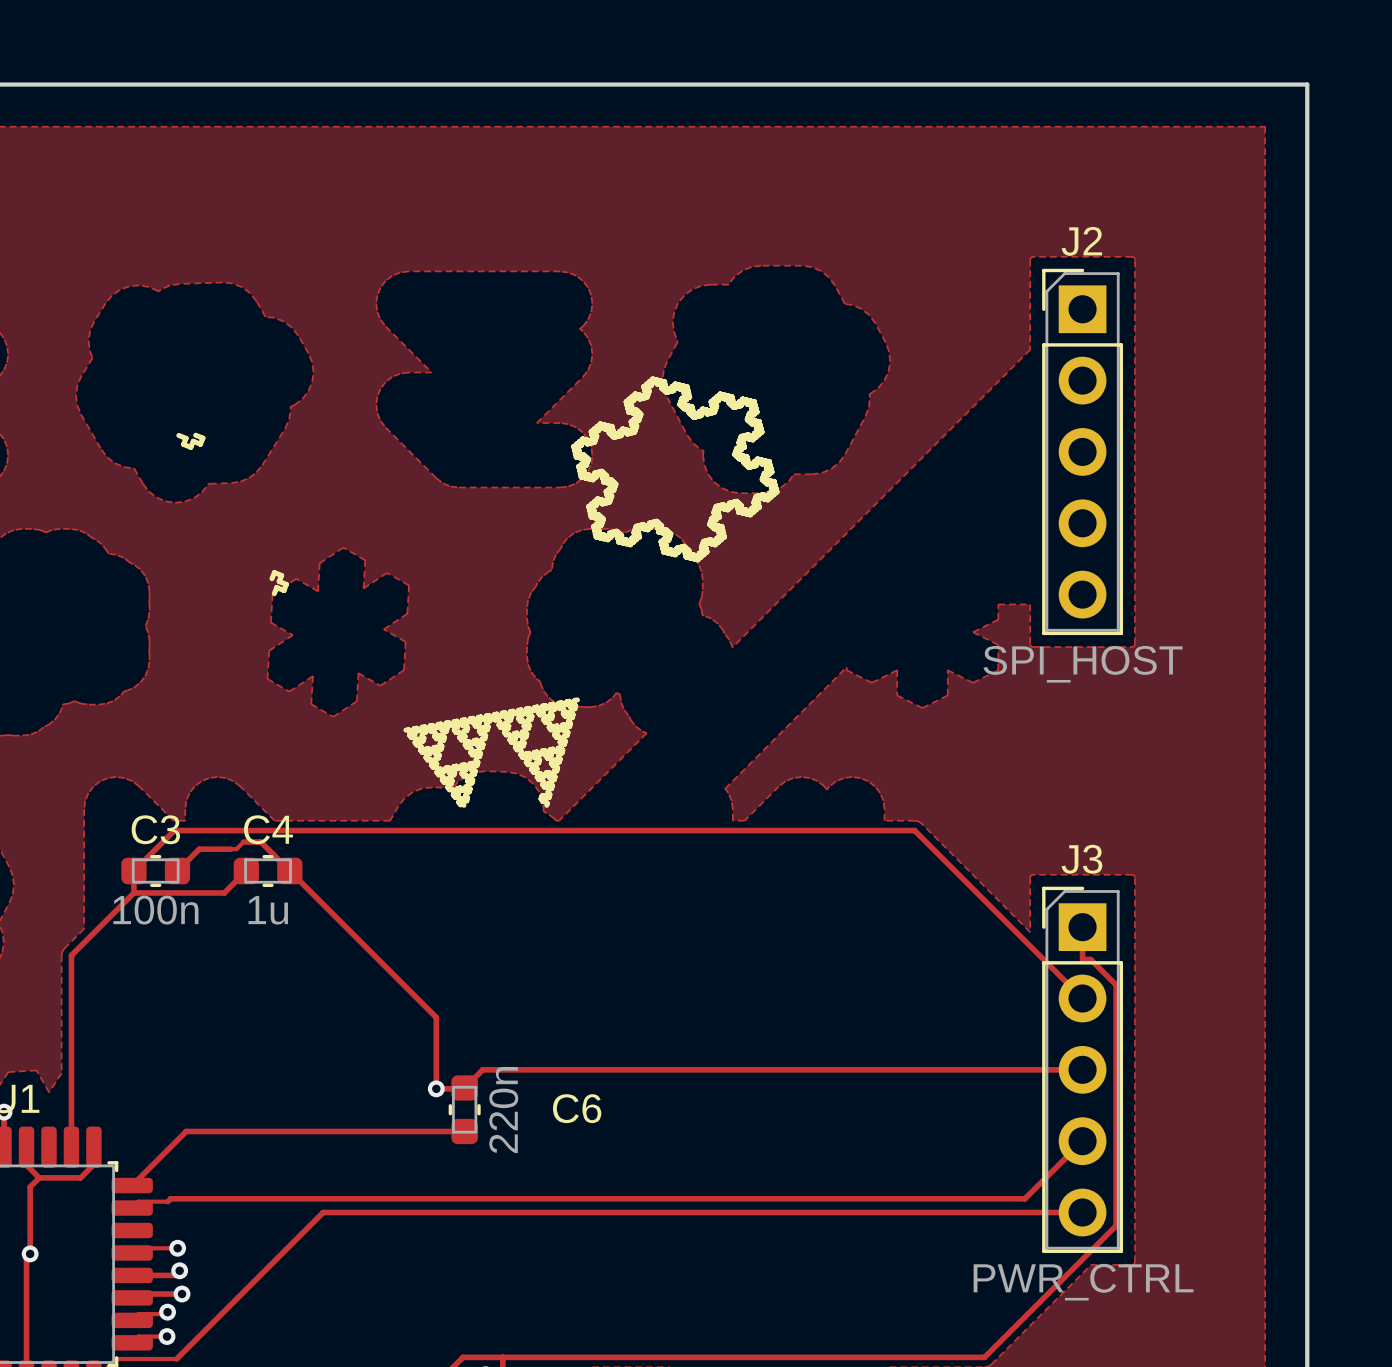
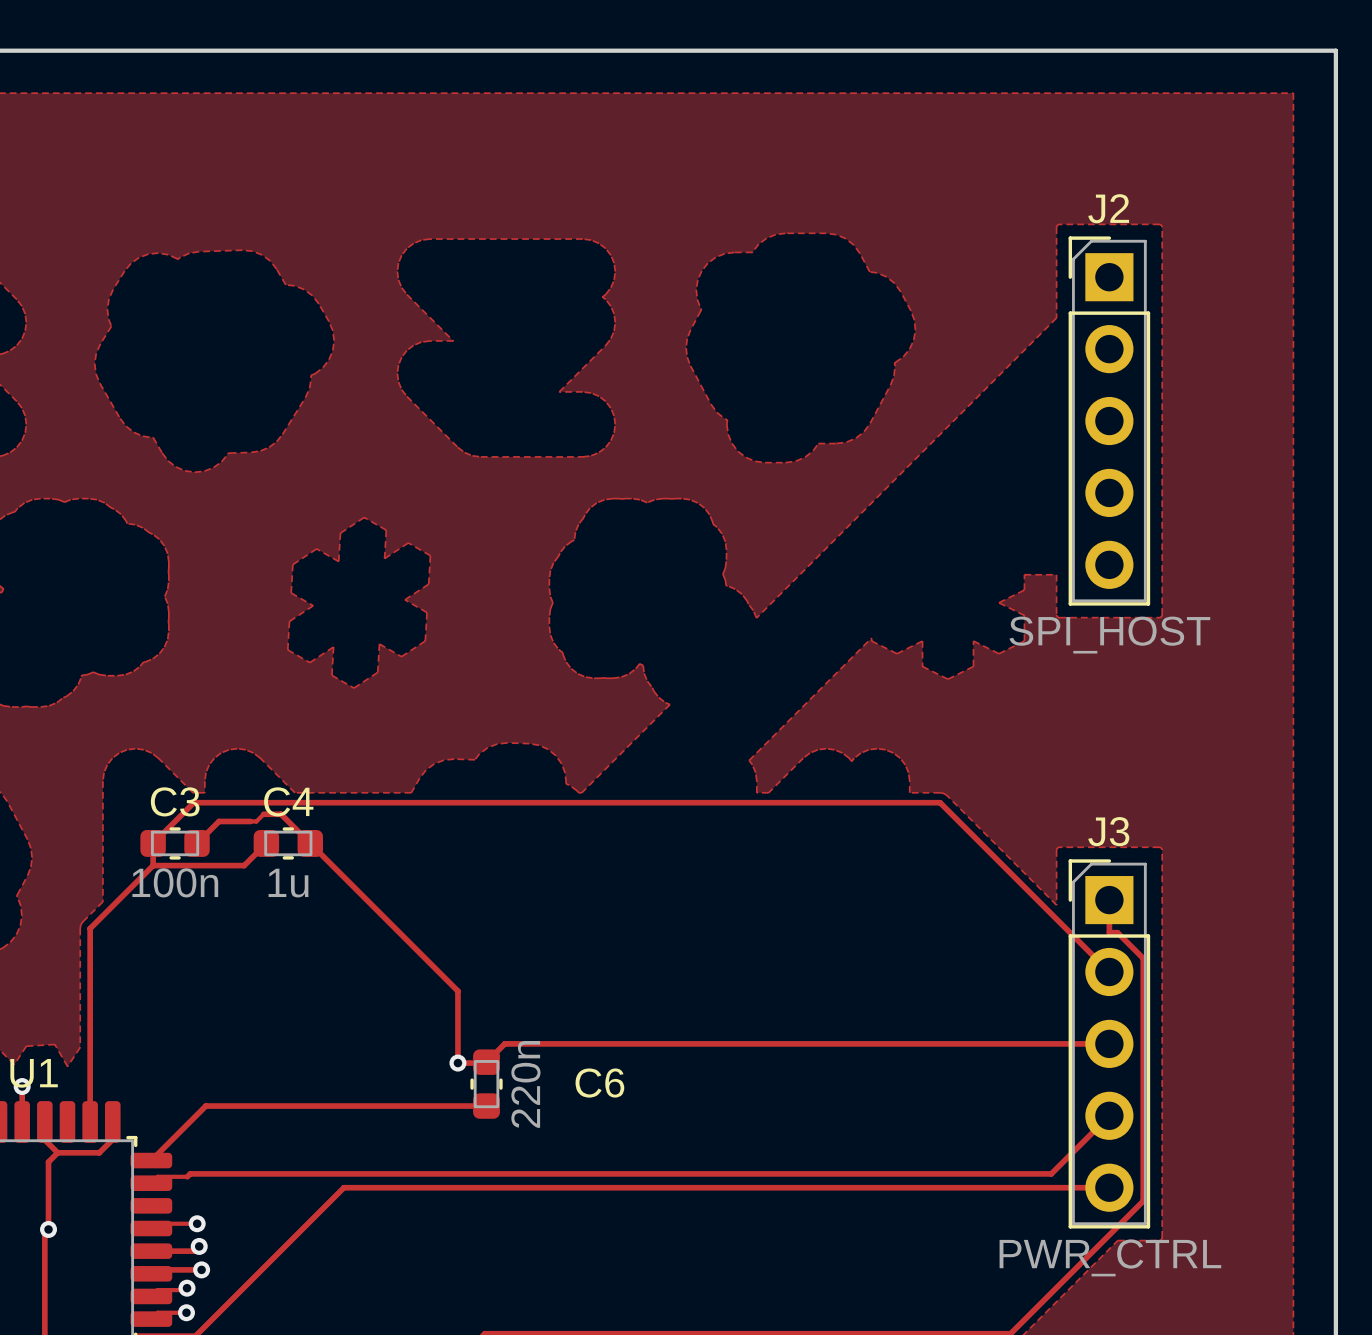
line: (652, 379) (649, 381) (650, 385) (647, 384) (644, 386) (644, 390) (648, 391) (645, 393) (646, 396) (642, 396) (639, 398) (639, 395) (635, 394) (632, 396) (633, 400) (629, 399) (626, 401) (627, 405) (631, 406) (628, 408) (629, 411) (632, 412) (635, 410) (636, 413) (640, 414) (637, 416) (638, 420) (634, 419) (631, 421) (632, 425) (636, 426) (633, 428) (634, 431) (630, 431) (627, 433) (626, 430) (622, 429) (619, 431) (620, 435) (617, 434) (614, 436) (613, 433) (609, 432) (612, 430) (611, 426) (607, 426) (604, 428) (604, 425) (600, 424) (597, 426) (598, 430) (594, 429) (591, 431) (592, 435) (596, 435) (593, 438) (594, 441) (590, 440) (587, 443) (586, 440) (582, 439) (580, 441) (580, 445) (577, 444) (574, 446) (575, 450) (578, 450) (575, 453) (576, 456) (580, 457) (583, 455) (584, 458) (587, 459) (584, 461) (585, 465) (582, 464) (579, 466) (579, 470) (583, 470) (580, 473) (581, 476) (585, 477) (588, 475) (589, 478) (592, 479) (595, 476) (594, 473) (598, 474) (601, 471) (602, 475) (606, 475) (603, 478) (604, 481) (607, 482) (610, 480) (611, 483) (615, 484) (612, 486) (613, 490) (609, 489) (606, 491) (607, 495) (611, 495) (608, 498) (609, 501) (605, 500) (602, 503) (601, 500) (597, 499) (594, 501) (595, 505) (592, 504) (589, 506) (589, 510) (593, 510) (590, 513) (591, 516) (595, 517) (598, 515) (599, 518) (602, 519) (599, 521) (600, 525) (597, 524) (594, 526) (594, 530) (598, 530) (595, 533) (596, 536) (600, 537) (603, 535) (604, 538) (607, 539) (610, 536) (609, 533) (613, 534) (616, 531) (617, 535) (621, 535) (618, 538) (619, 541) (622, 542) (625, 540) (626, 543) (630, 544) (633, 541) (632, 538) (636, 539) (639, 536) (638, 533) (634, 532) (637, 530) (636, 526) (640, 527) (643, 525) (644, 528) (647, 529) (650, 526) (649, 523) (653, 524) (656, 521) (657, 525) (661, 525) (658, 528) (659, 531) (662, 532) (665, 530) (666, 533) (670, 534) (667, 536) (668, 540) (664, 539) (661, 541) (662, 545) (666, 545) (663, 548) (664, 551) (667, 552) (670, 550) (671, 553) (675, 554) (678, 551) (677, 548) (681, 549) (684, 546) (684, 550) (688, 550) (685, 553) (686, 556) (690, 557) (693, 555) (693, 558) (697, 559) (700, 556) (699, 553) (703, 554) (706, 551) (705, 548) (701, 547) (704, 545) (703, 541) (707, 542) (710, 540) (711, 543) (715, 544) (718, 541) (717, 538) (721, 539) (723, 536) (723, 533) (719, 532) (722, 530) (721, 526) (717, 525) (714, 528) (713, 525) (710, 524) (713, 521) (712, 518) (716, 519) (718, 516) (718, 513) (714, 512) (717, 510) (716, 506) (720, 507) (723, 505) (723, 508) (727, 509) (730, 506) (729, 503) (733, 504) (736, 501) (737, 505) (741, 506) (738, 508) (738, 511) (742, 512) (745, 510) (746, 513) (750, 514) (753, 511) (752, 508) (756, 509) (758, 506) (758, 503) (754, 502) (757, 500) (756, 496) (760, 497) (763, 495) (763, 498) (767, 499) (770, 496) (769, 493) (773, 494) (776, 491) (775, 488) (771, 487) (774, 485) (773, 481) (770, 481) (767, 483) (766, 480) (762, 479) (765, 476) (764, 473) (768, 474) (771, 471) (770, 468) (766, 467) (769, 465) (768, 461) (765, 461) (762, 463) (761, 460) (757, 459) (754, 461) (755, 465) (751, 464) (749, 466) (748, 463) (744, 462) (747, 460) (746, 456) (742, 456) (739, 458) (739, 455) (735, 454) (738, 451) (737, 448) (741, 449) (744, 446) (743, 443) (739, 442) (742, 440) (741, 436) (745, 437) (748, 435) (749, 438) (752, 439) (755, 436) (754, 433) (758, 434) (761, 431) (760, 428) (756, 427) (759, 425) (759, 421) (755, 421) (752, 423) (751, 420) (747, 419) (750, 416) (749, 413) (753, 414) (756, 411) (755, 408) (751, 407) (754, 405) (754, 401) (750, 401) (747, 403) (746, 400) (742, 399) (739, 401) (740, 405) (736, 404) (734, 406) (733, 403) (729, 402) (732, 400) (731, 396) (727, 396) (724, 398) (724, 395) (720, 394) (717, 396) (718, 400) (714, 399) (711, 401) (712, 405) (716, 406) (713, 408) (714, 411) (710, 411) (707, 413) (706, 410) (702, 409) (699, 411) (700, 415) (696, 414) (694, 416) (693, 413) (689, 412) (692, 410) (691, 406) (687, 406) (684, 408) (684, 405) (680, 404) (683, 401) (682, 398) (686, 399) (689, 396) (688, 393) (684, 392) (687, 390) (686, 386) (682, 386) (679, 388) (679, 385) (675, 384) (672, 386) (673, 390) (669, 389) (666, 391) (665, 388) (662, 387) (664, 385) (664, 381) (660, 381) (657, 383) (656, 380) (652, 379) -> none
line: (178, 435) (186, 438) (183, 444) (190, 447) (193, 441) (200, 444) (202, 438) (195, 435) -> none
line: (272, 578) (274, 572) (281, 575) (279, 581) (286, 584) (283, 590) (276, 587) (274, 593) -> none
line: (577, 699) (574, 700) (573, 703) (574, 708) (572, 709) (570, 706) (569, 701) (563, 705) (561, 702) (558, 703) (557, 706) (559, 708) (562, 708) (565, 716) (567, 715) (568, 712) (571, 712) (573, 714) (572, 717) (569, 718) (569, 726) (562, 724) (561, 727) (567, 732) (563, 738) (564, 744) (561, 744) (560, 739) (554, 734) (555, 731) (558, 731) (557, 725) (550, 729) (549, 724) (543, 719) (544, 716) (547, 716) (549, 718) (551, 718) (551, 710) (554, 709) (555, 706) (553, 704) (547, 708) (545, 705) (542, 706) (542, 714) (540, 714) (538, 712) (537, 706) (531, 710) (529, 708) (526, 708) (525, 711) (531, 716) (531, 719) (528, 719) (528, 728) (525, 728) (523, 720) (520, 721) (518, 718) (522, 712) (521, 709) (514, 713) (513, 711) (510, 711) (510, 720) (507, 720) (506, 718) (505, 712) (498, 716) (497, 714) (494, 714) (493, 717) (495, 720) (497, 719) (500, 727) (503, 726) (504, 724) (506, 723) (508, 726) (504, 732) (506, 734) (508, 734) (511, 742) (514, 741) (515, 738) (514, 733) (521, 735) (522, 732) (524, 731) (526, 734) (522, 740) (523, 745) (516, 744) (515, 747) (517, 749) (519, 749) (522, 757) (528, 753) (530, 755) (526, 762) (528, 764) (530, 764) (533, 772) (536, 771) (536, 763) (538, 762) (539, 759) (537, 757) (535, 757) (534, 752) (541, 753) (542, 751) (544, 750) (547, 758) (550, 758) (550, 749) (557, 751) (558, 748) (560, 747) (562, 750) (561, 753) (559, 753) (559, 762) (552, 760) (551, 763) (557, 767) (556, 770) (554, 771) (554, 779) (551, 780) (549, 777) (548, 772) (542, 776) (540, 773) (538, 774) (537, 777) (538, 779) (541, 779) (544, 787) (547, 786) (547, 783) (550, 783) (552, 785) (548, 792) (549, 797) (541, 795) (541, 798) (542, 801) (545, 800) (546, 805) -> none
line: (405, 730) (408, 729) (410, 732) (411, 737) (414, 737) (413, 728) (416, 728) (418, 730) (424, 726) (426, 729) (425, 732) (422, 732) (423, 741) (420, 741) (418, 739) (415, 739) (415, 742) (421, 747) (422, 752) (428, 748) (429, 754) (426, 754) (425, 757) (432, 761) (433, 767) (435, 766) (434, 761) (439, 755) (433, 750) (433, 747) (441, 749) (440, 740) (443, 740) (444, 737) (442, 734) (436, 738) (433, 730) (431, 731) (429, 728) (430, 725) (432, 725) (434, 727) (440, 724) (441, 729) (443, 731) (446, 731) (446, 723) (448, 722) (450, 725) (456, 721) (458, 723) (454, 730) (456, 732) (458, 732) (461, 739) (464, 739) (464, 731) (466, 730) (467, 727) (465, 725) (463, 725) (462, 720) (464, 719) (466, 722) (472, 718) (473, 723) (475, 726) (478, 725) (478, 717) (480, 716) (482, 719) (488, 715) (490, 717) (489, 720) (487, 721) (487, 729) (484, 730) (482, 727) (480, 728) (479, 731) (485, 735) (484, 738) (482, 739) (482, 747) (479, 748) (477, 745) (476, 740) (474, 740) (473, 743) (466, 742) (465, 744) (471, 749) (472, 754) (475, 754) (476, 751) (478, 751) (480, 753) (476, 759) (477, 765) (469, 763) (470, 769) (473, 768) (475, 771) (474, 774) (471, 774) (471, 783) (469, 783) (466, 775) (463, 776) (461, 773) (466, 767) (464, 764) (461, 765) (460, 768) (453, 766) (453, 775) (451, 775) (448, 767) (445, 768) (444, 770) (437, 769) (436, 772) (443, 776) (444, 782) (450, 778) (452, 780) (447, 787) (454, 791) (455, 797) (457, 796) (458, 793) (457, 788) (464, 789) (465, 786) (468, 786) (470, 788) (469, 791) (466, 792) (466, 800) (459, 799) (458, 802) (463, 805) -> none

